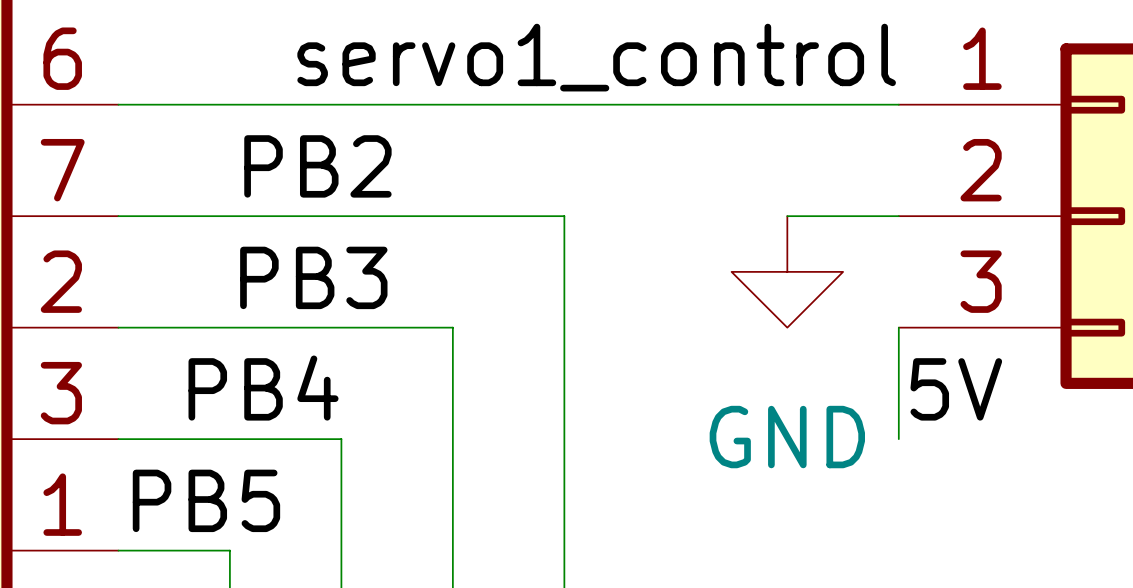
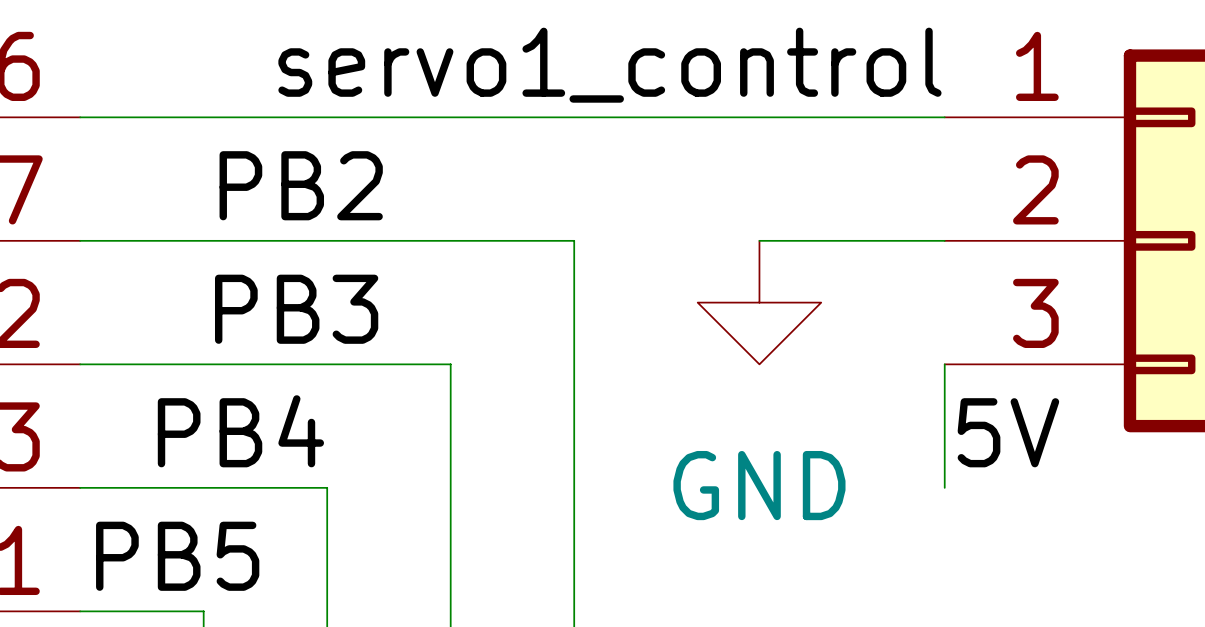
wire: none -> (759, 240) (821, 240)
power symbol position: GND (787, 271) -> GND (759, 302)

